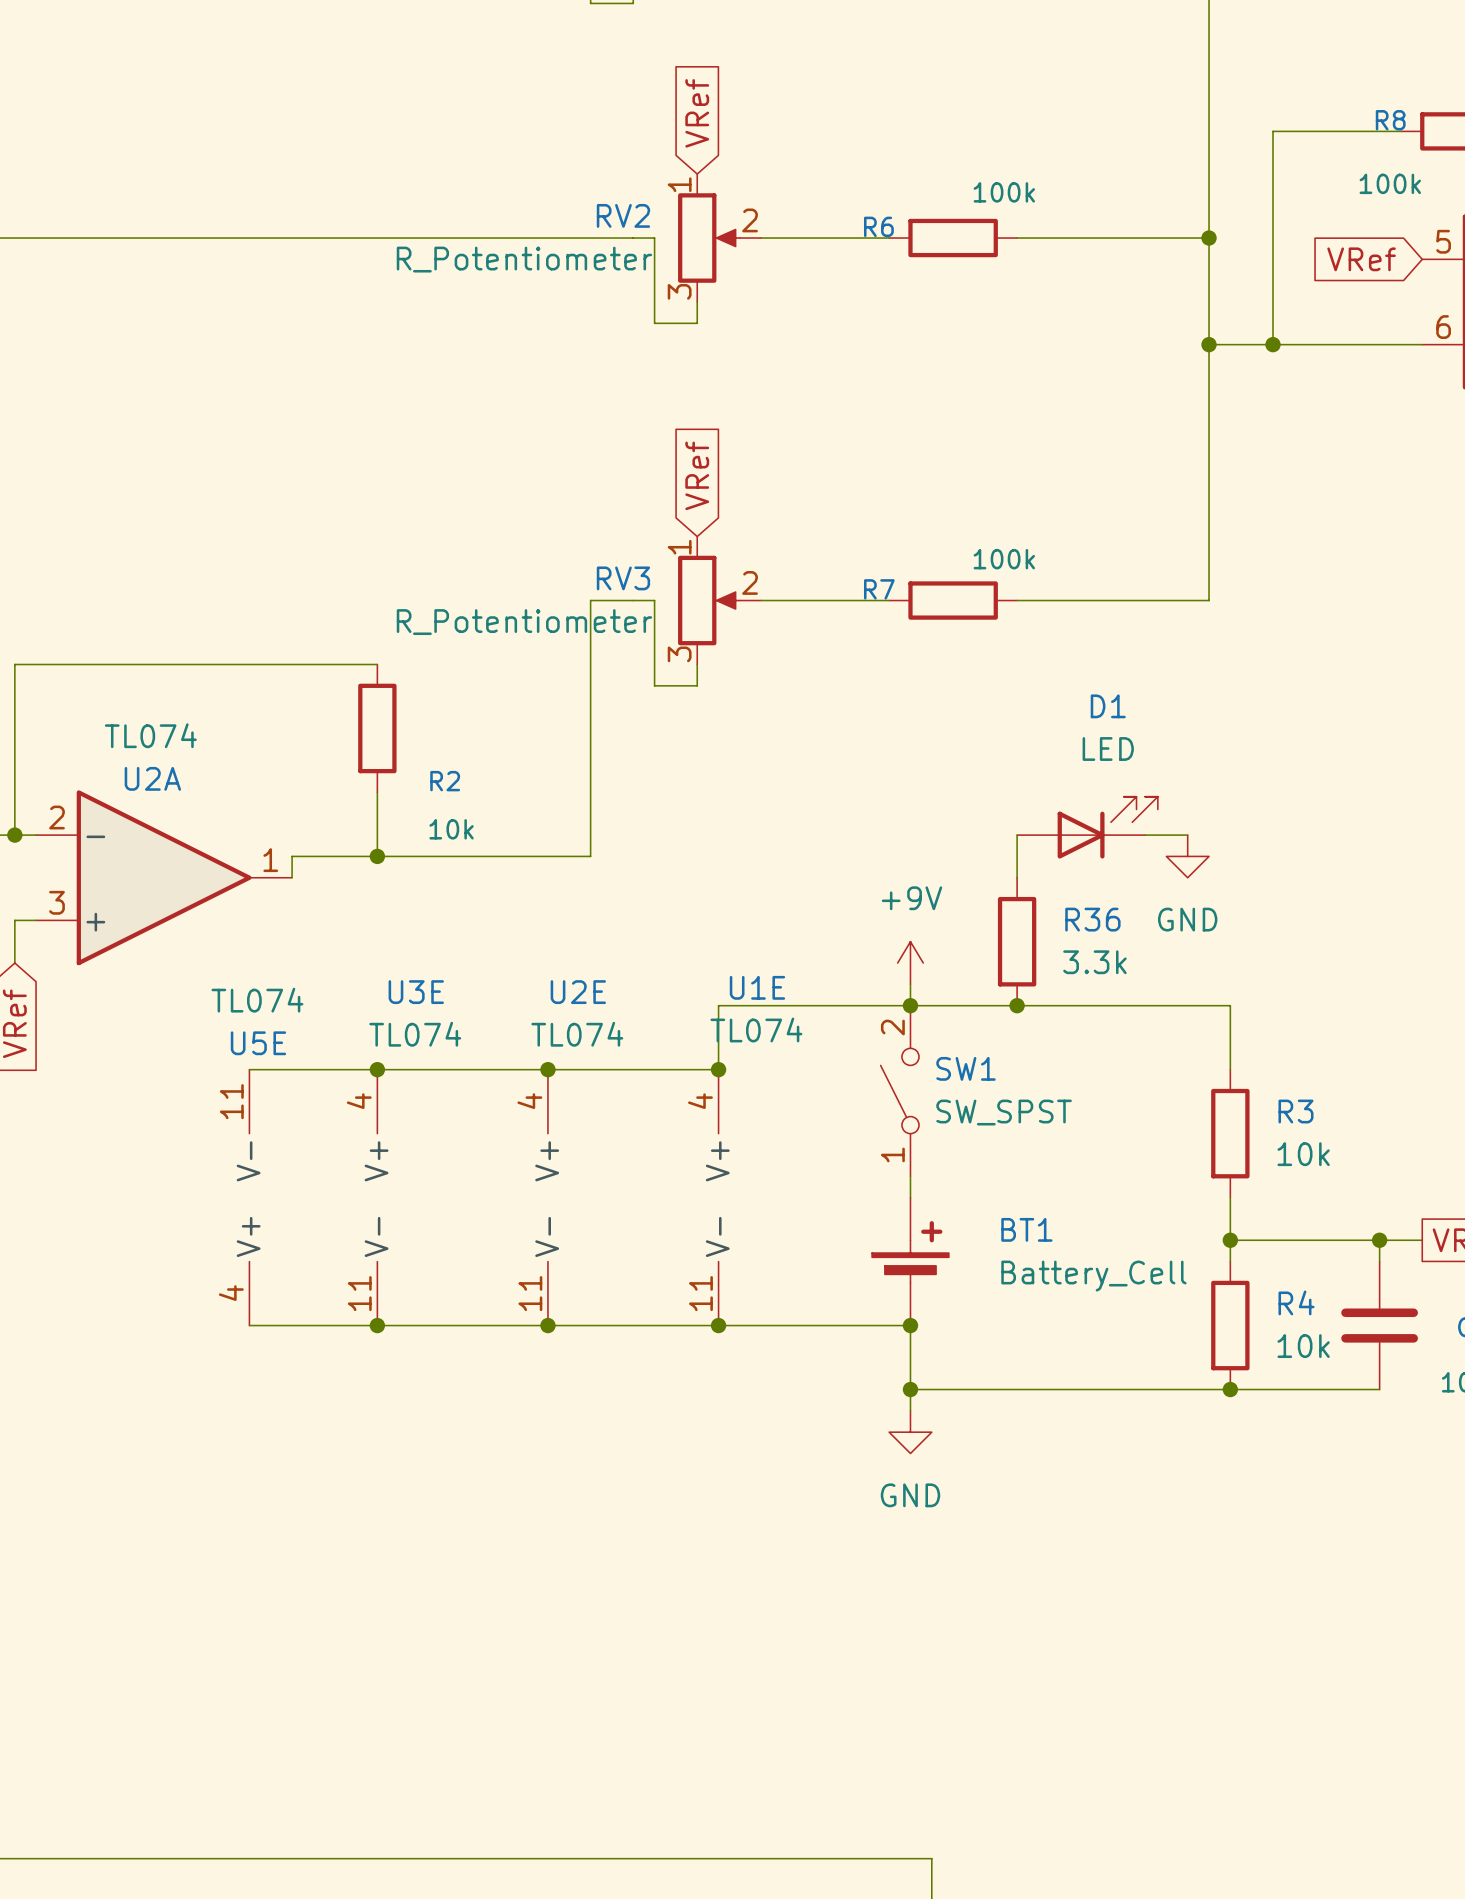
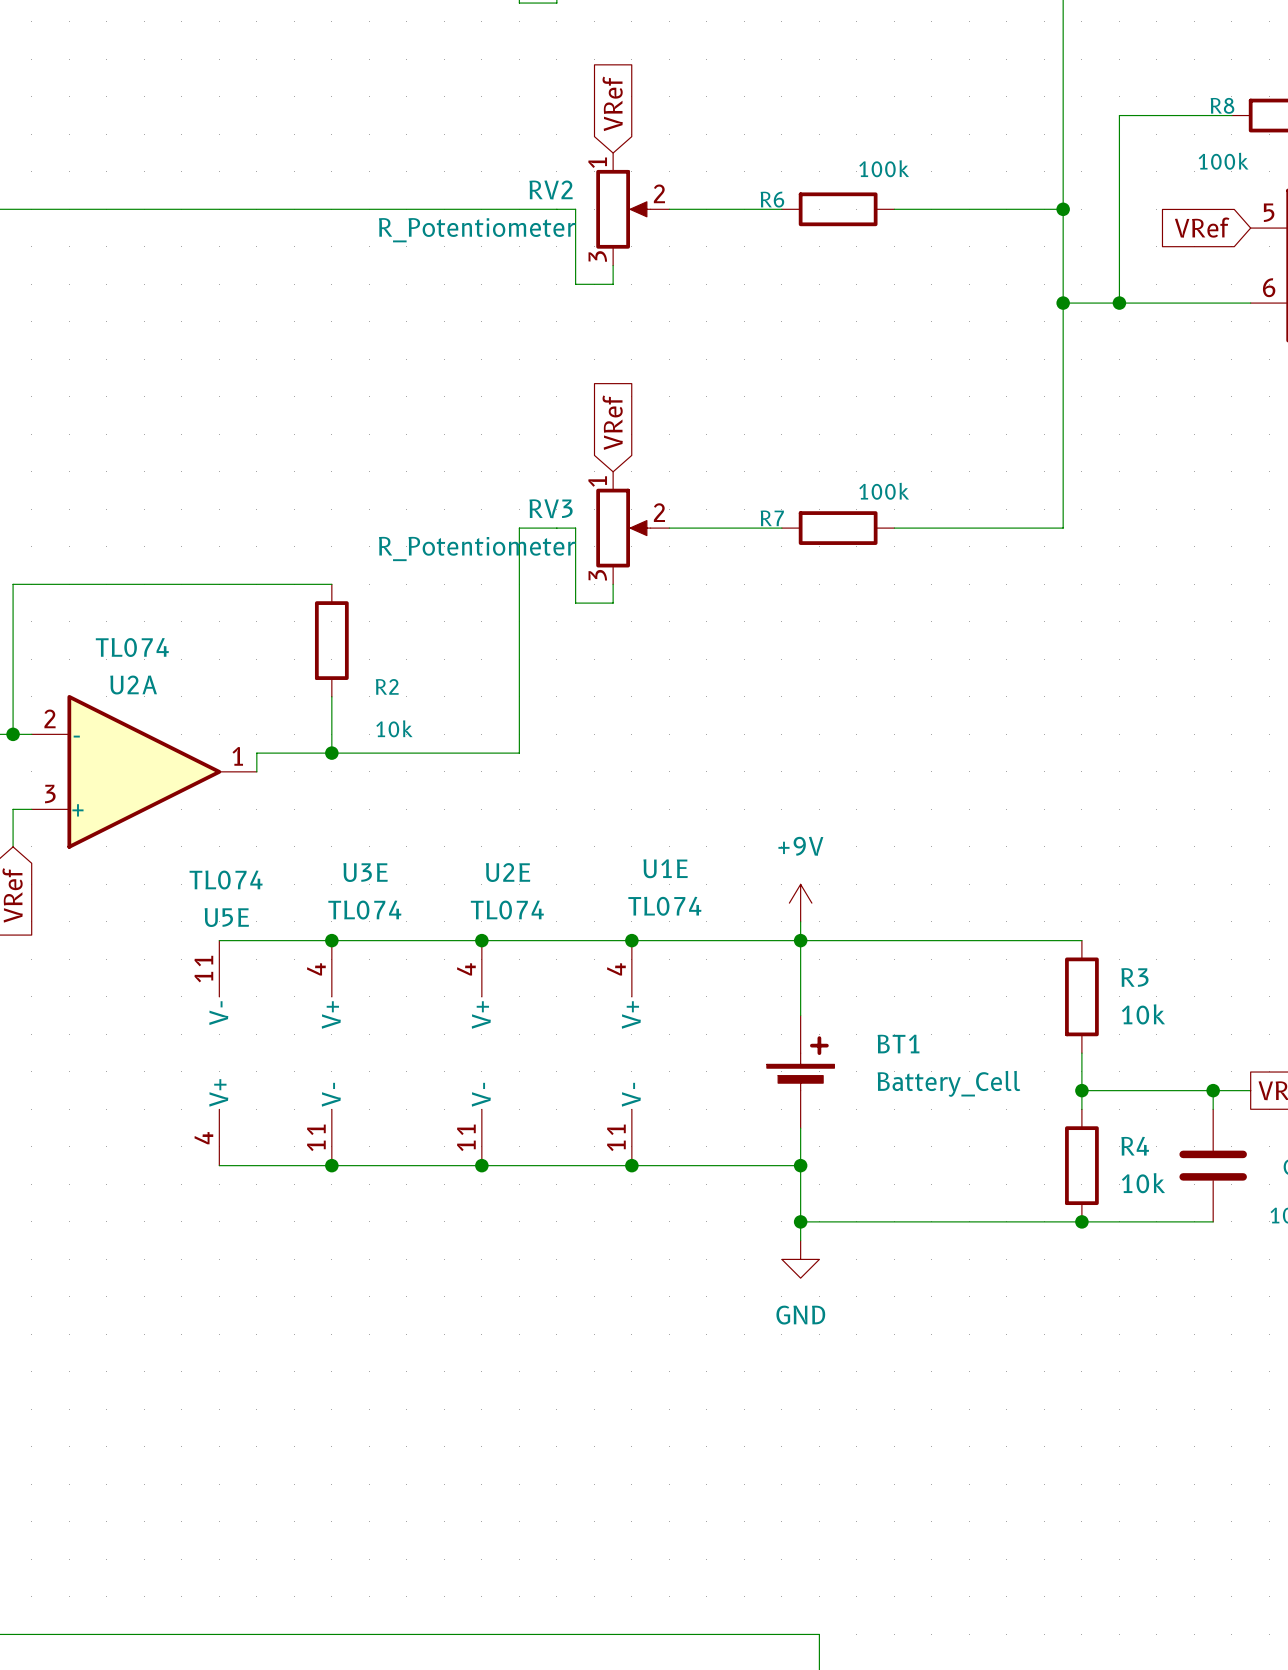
D1: LED (1087, 827) -> none
wire: (1017, 835) (1017, 877) -> none
wire: (1145, 835) (1187, 835) -> none
power symbol: GND (1187, 856) -> none
R36: 3.3k (1017, 941) -> none
power symbol position: +9V (910, 963) -> +9V (800, 903)
wire: (910, 984) (910, 1005) -> none
junction: (910, 1005) -> none
junction: (1017, 1005) -> none
wire: none -> (800, 921) (800, 1015)
wire: (718, 1069) (718, 1005) (1230, 1005) (1230, 1069) -> (631, 940) (1081, 940)
junction: none -> (800, 940)
SW1: SW_SPST (899, 1090) -> none
BT1 position: (910, 1261) -> (800, 1071)

